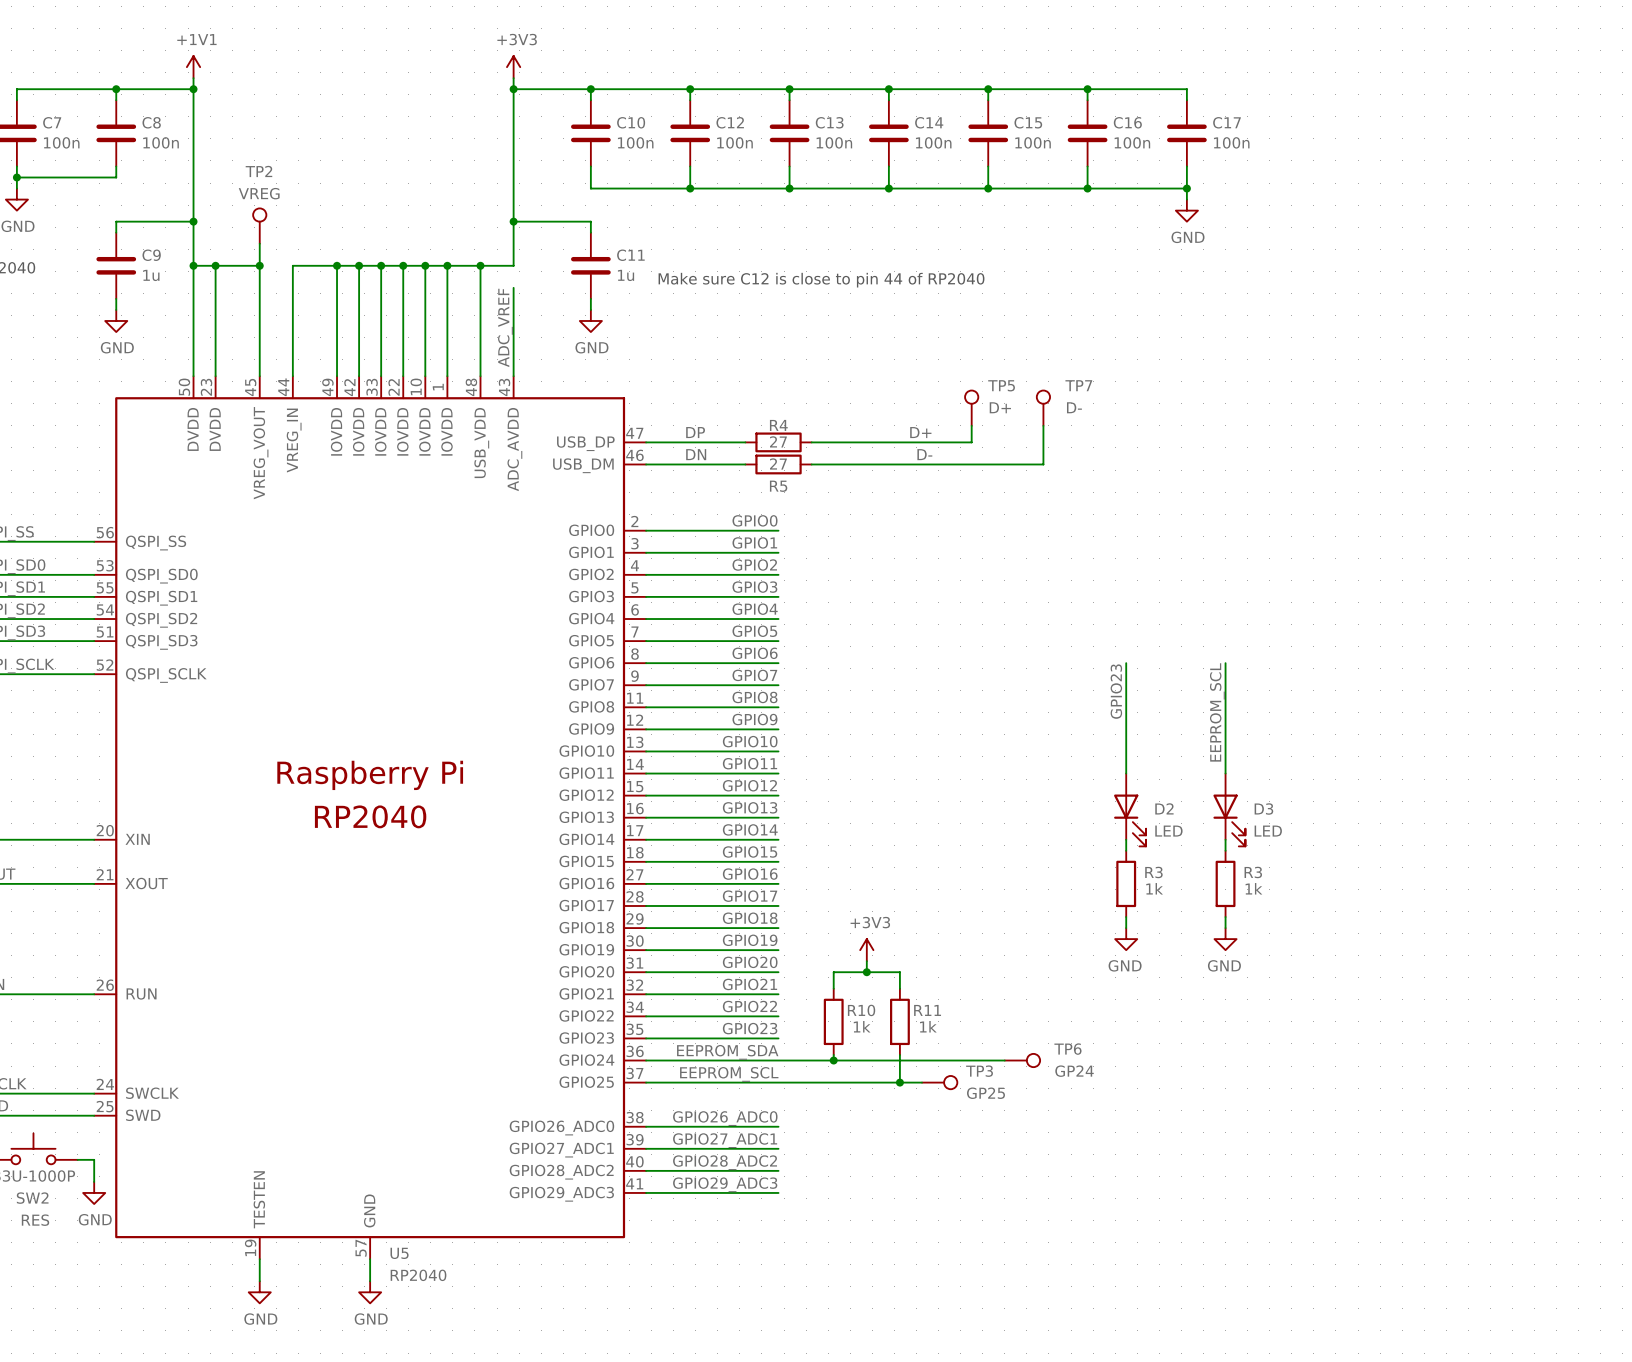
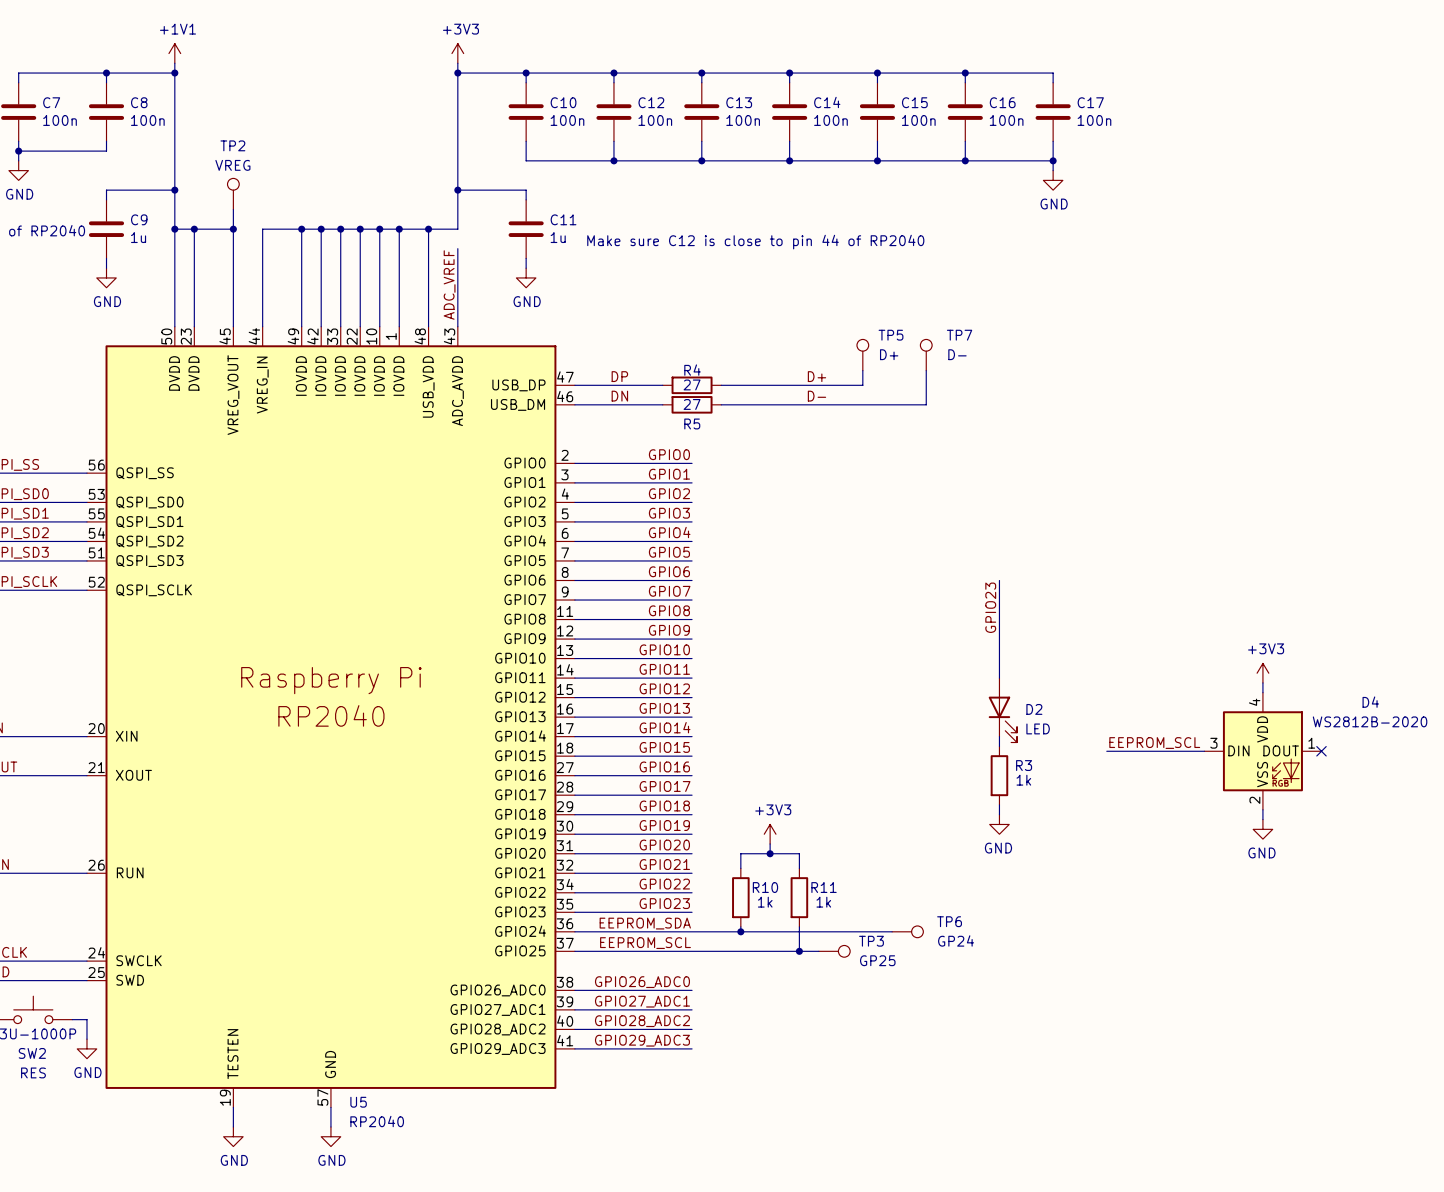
wire: (1225, 663) (1225, 773) -> none
label rotation: 0° (1217, 712) -> 90° clockwise (1154, 743)
label position: EEPROM_SCL (1217, 712) -> EEPROM_SCL (1154, 743)
power symbol: none -> +3V3 (1262, 673)
D3: LED (1229, 809) -> none
wire: (1225, 839) (1225, 850) -> (1262, 682) (1262, 692)
wire: none -> (1106, 751) (1204, 751)
D4: none -> WS2812B-2020 (1262, 751)
no-connect mark: none -> (1321, 751)
R3: 1k (1225, 883) -> none
wire: (1225, 917) (1225, 928) -> (1262, 809) (1262, 819)
power symbol position: GND (1225, 939) -> GND (1262, 829)

